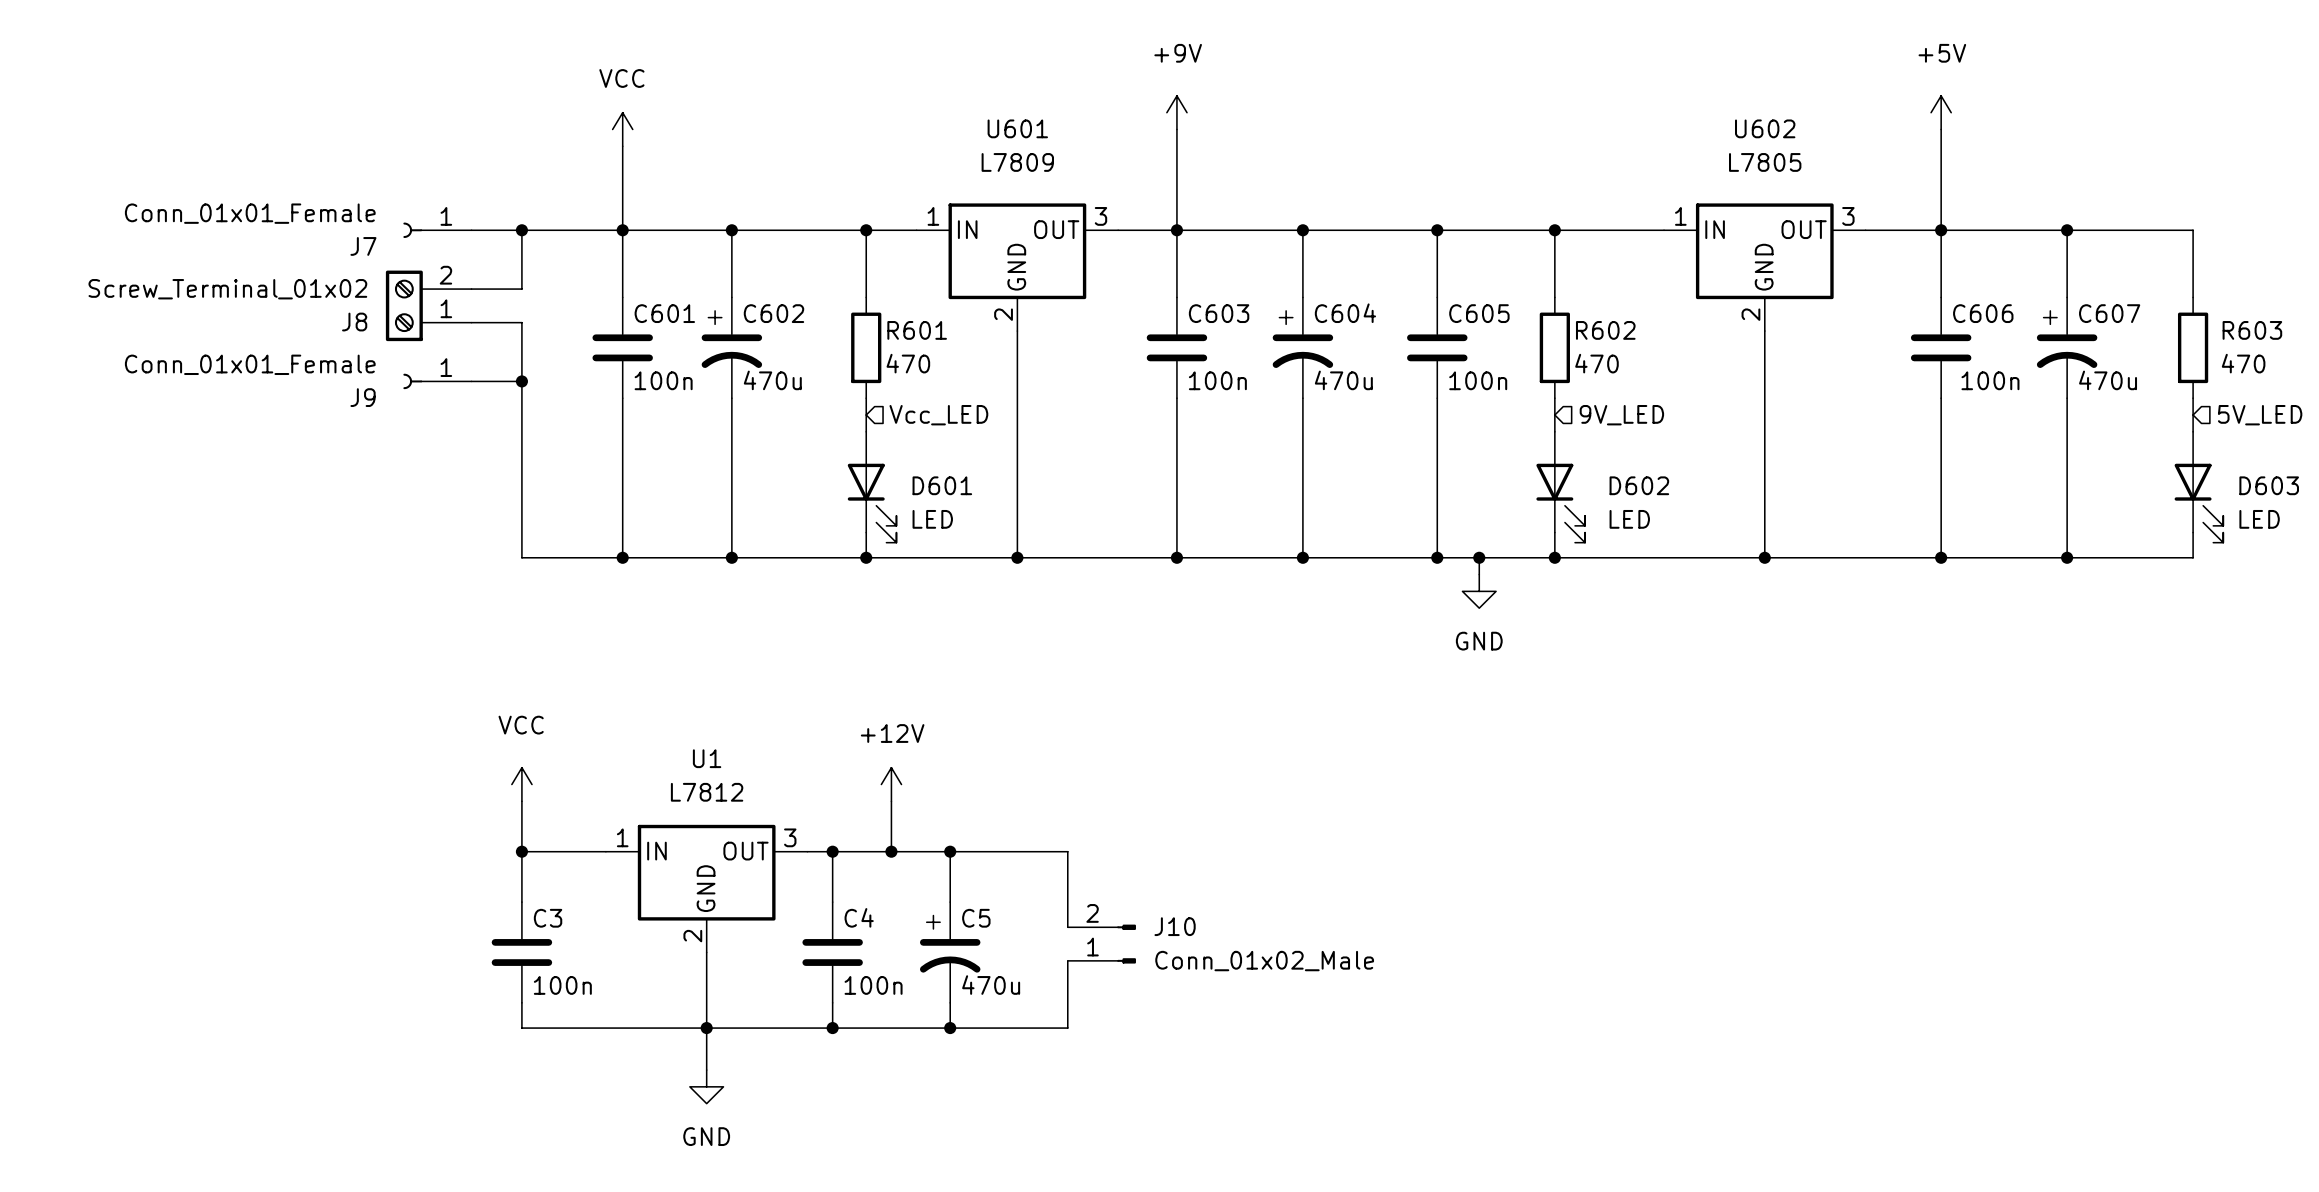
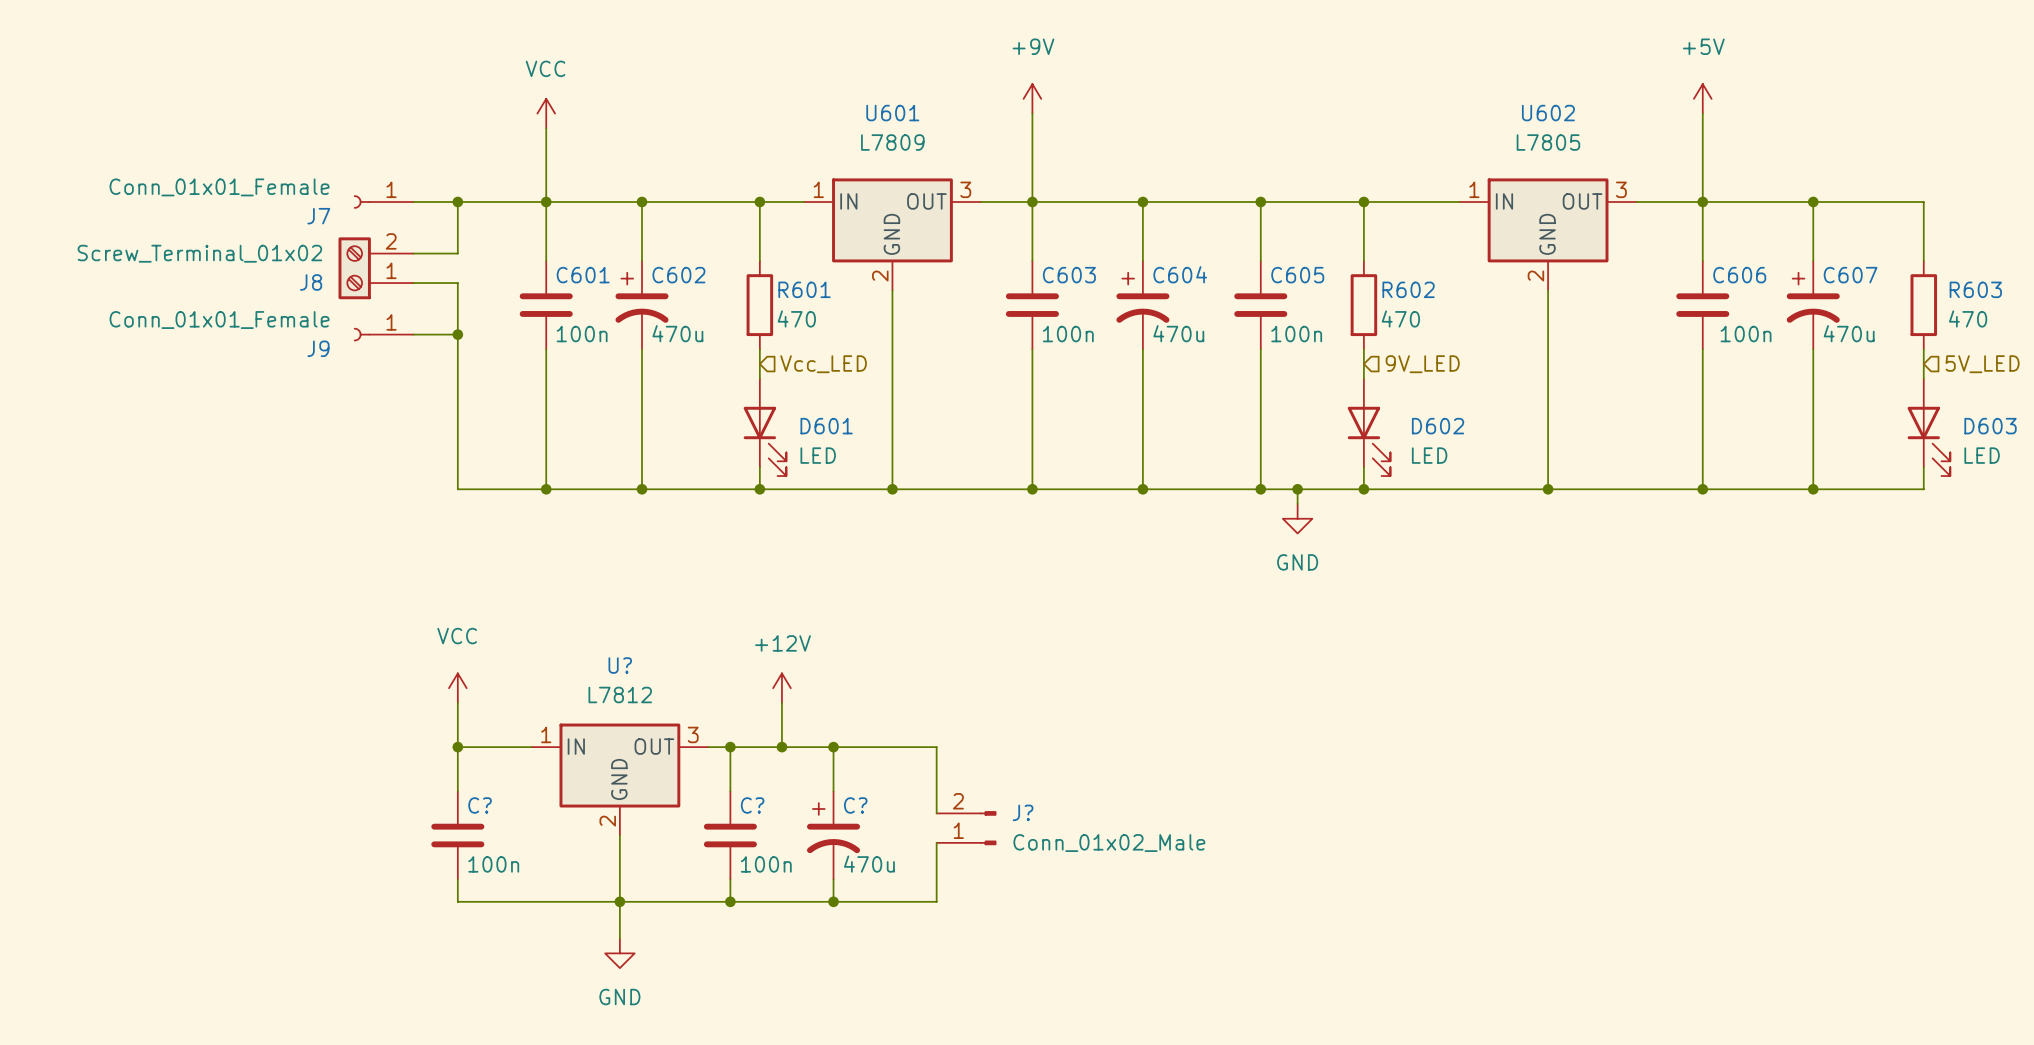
U1 name: U1 (707, 758) -> U? (620, 665)
C4 name: C4 (859, 917) -> C? (752, 805)
C3 name: C3 (548, 918) -> C? (480, 805)
C5 name: C5 (976, 918) -> C? (855, 805)
J10 name: J10 (1175, 926) -> J? (1023, 812)

